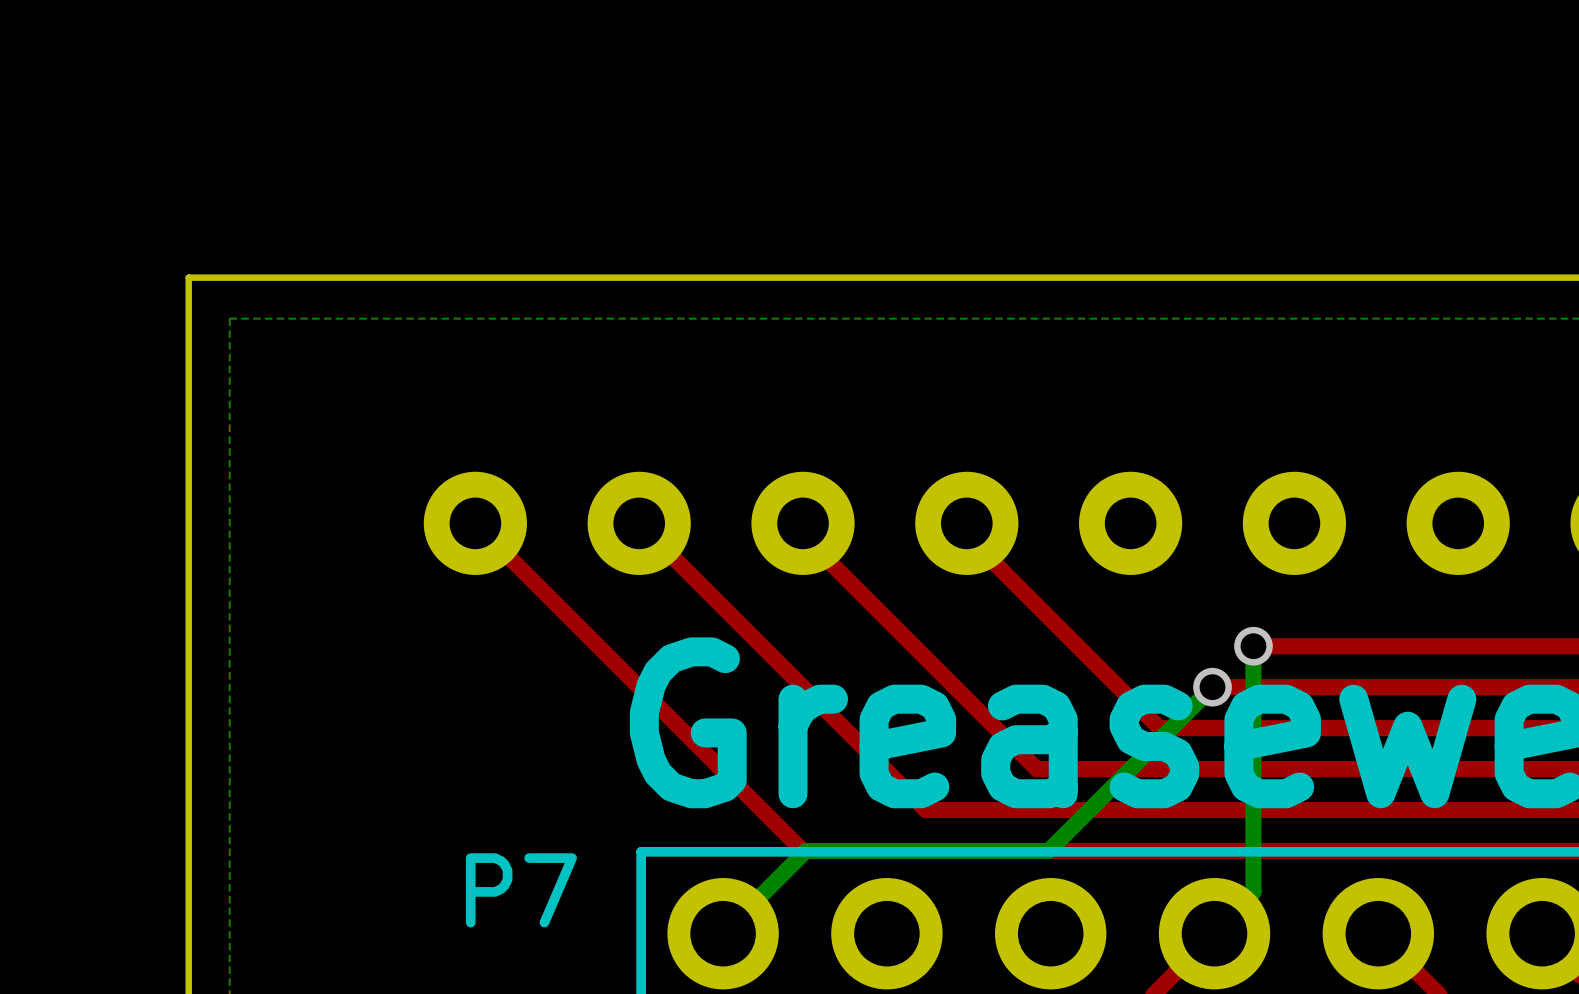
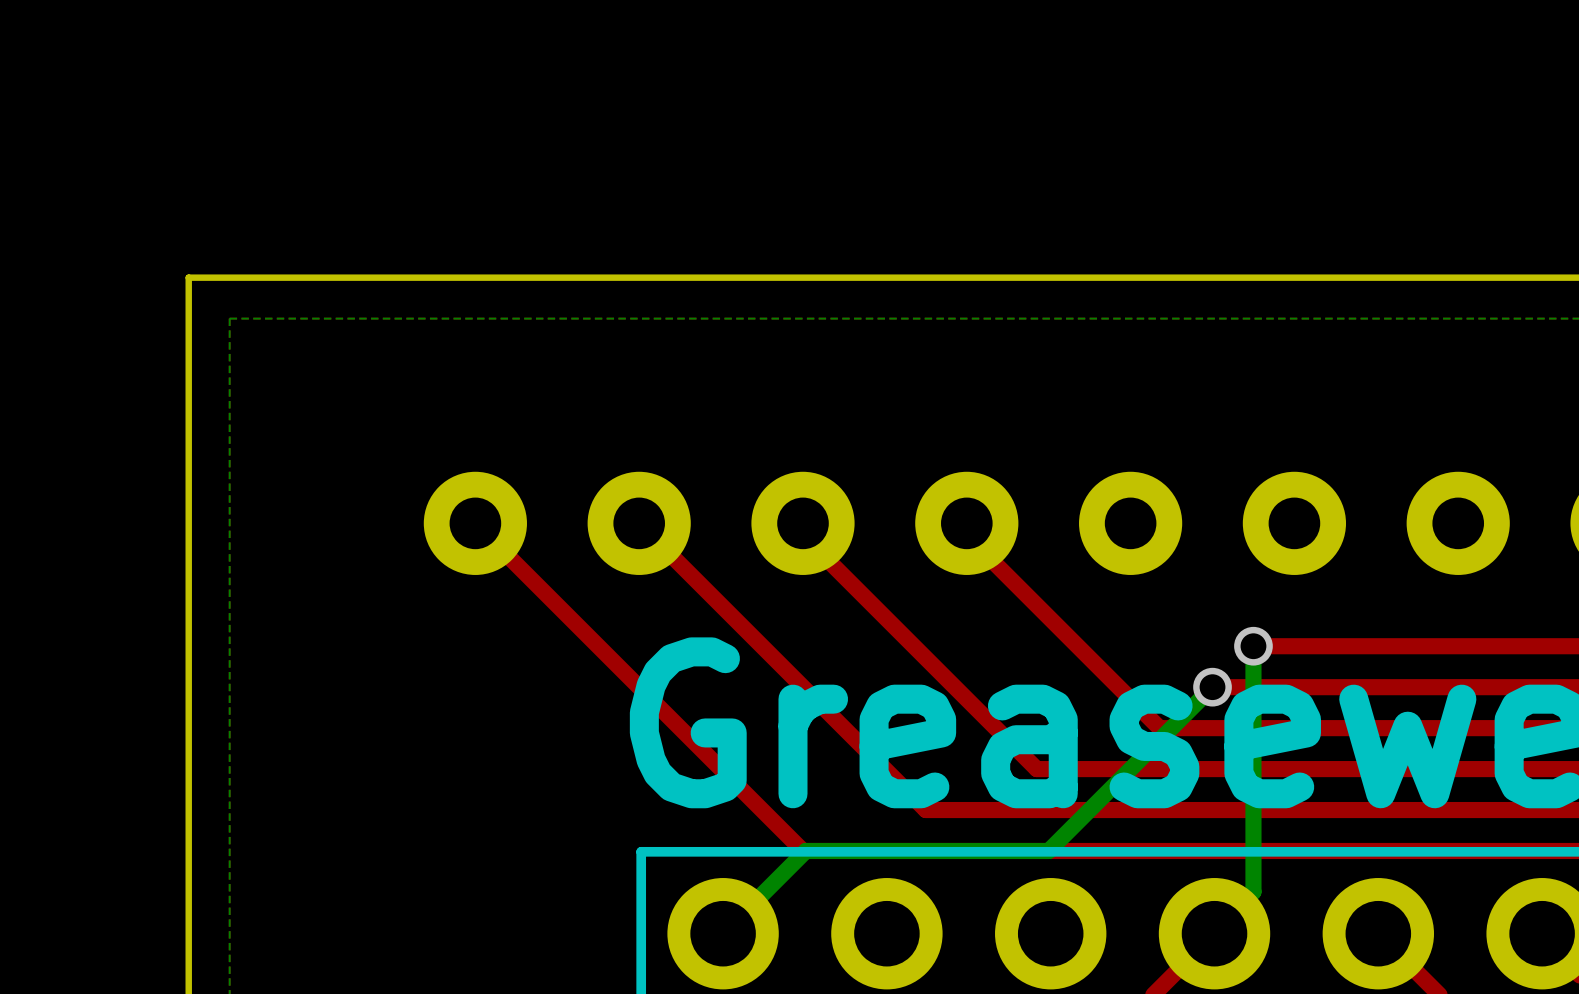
P7 name: P7 (521, 890) -> none

